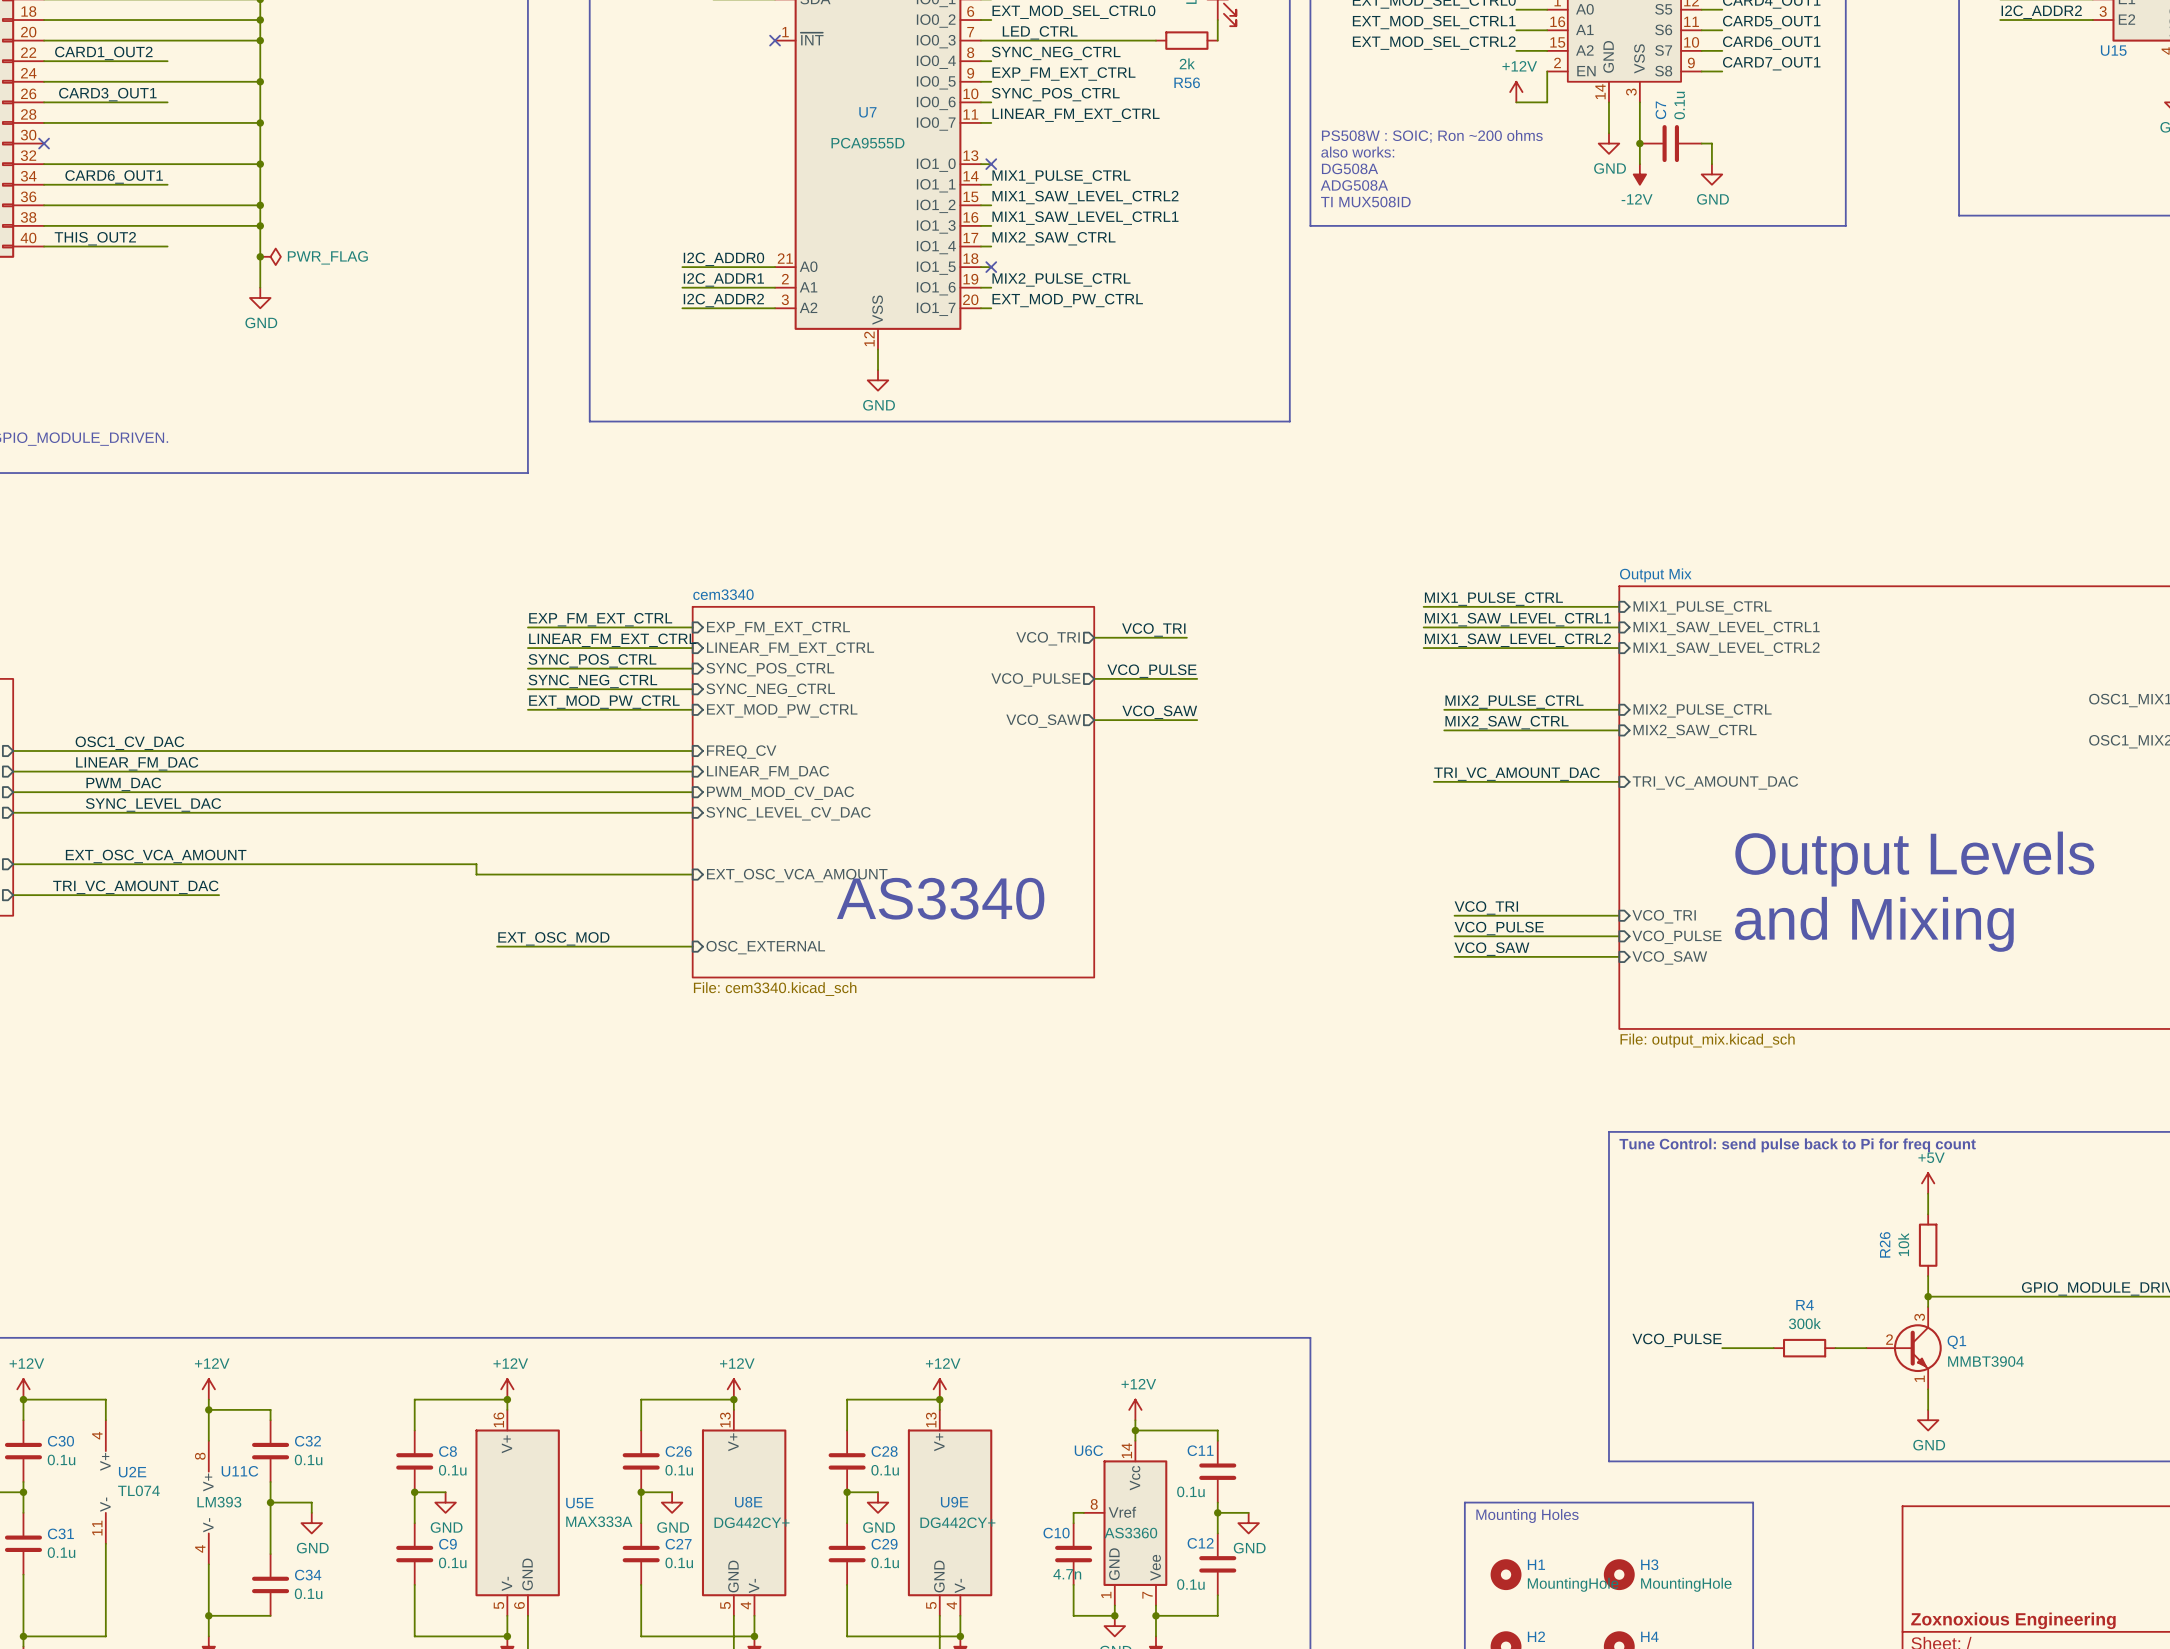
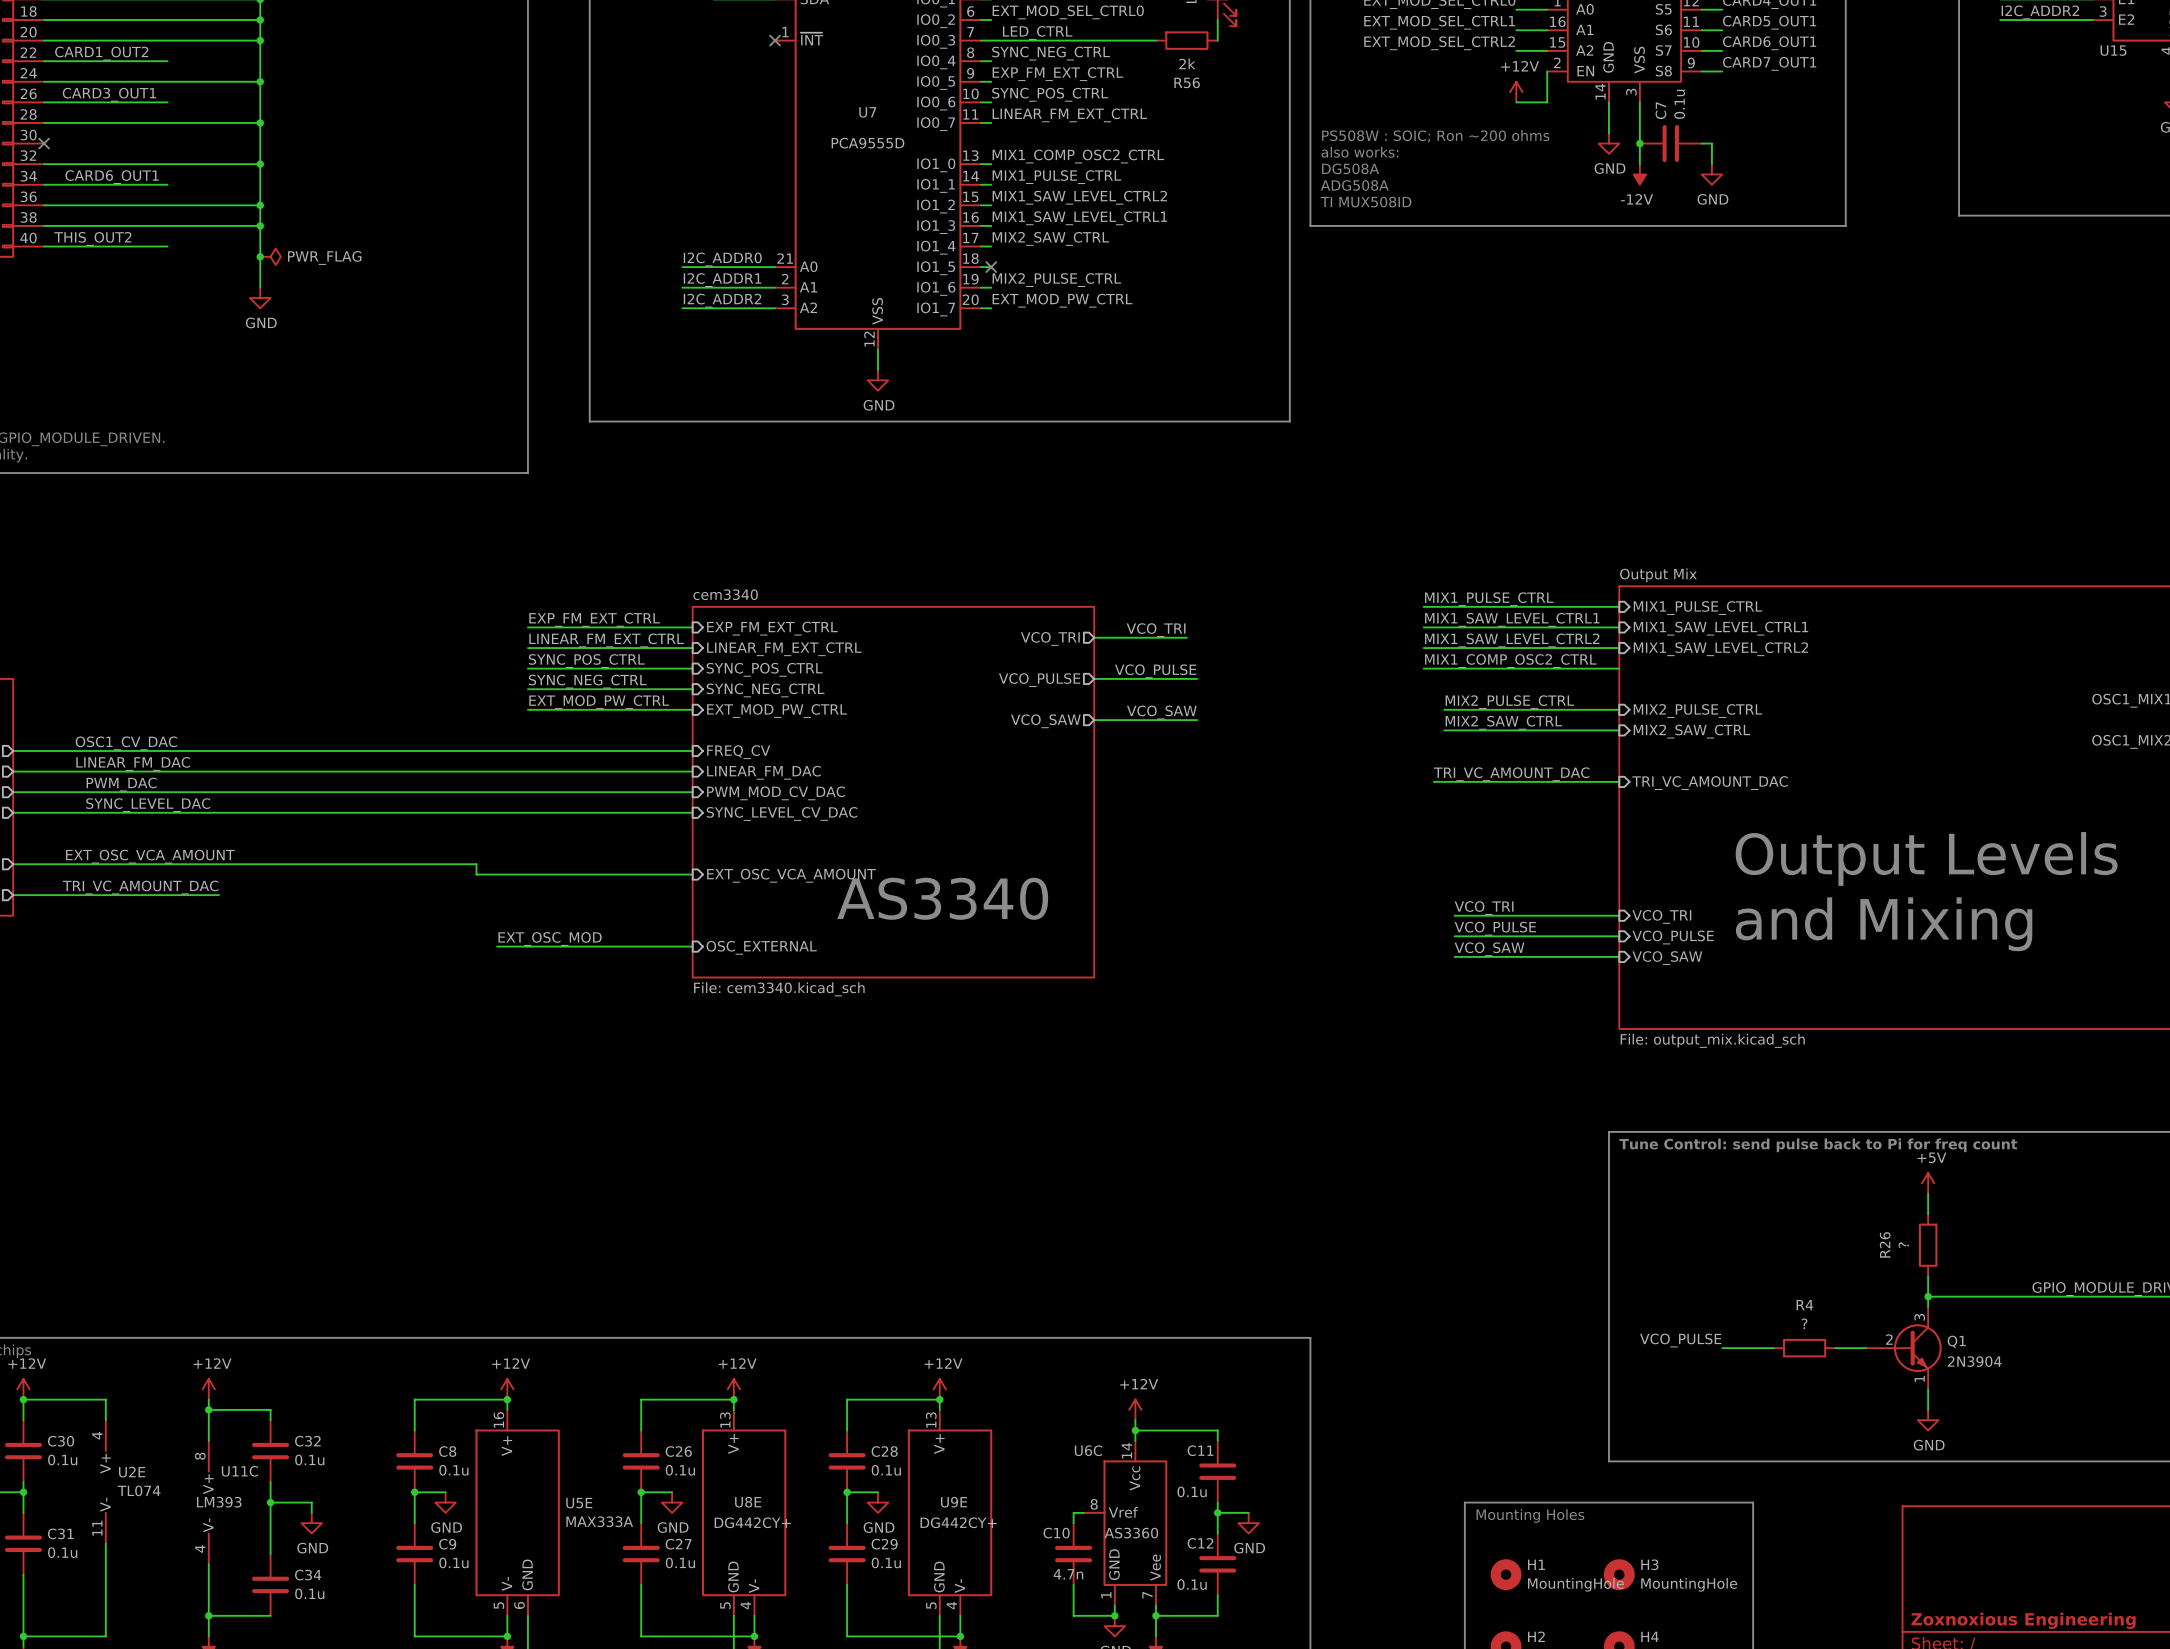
label: none -> MIX1_COMP_OSC2_CTRL (1078, 156)
no-connect mark: (991, 164) -> none
label: none -> MIX1_COMP_OSC2_CTRL (1510, 661)
wire: none -> (1423, 668) (1619, 668)
R26 value: 10k (1903, 1244) -> ? (1903, 1245)
R4 value: 300k (1804, 1323) -> ? (1804, 1323)
Q1 value: MMBT3904 (1985, 1361) -> 2N3904 (1974, 1361)

